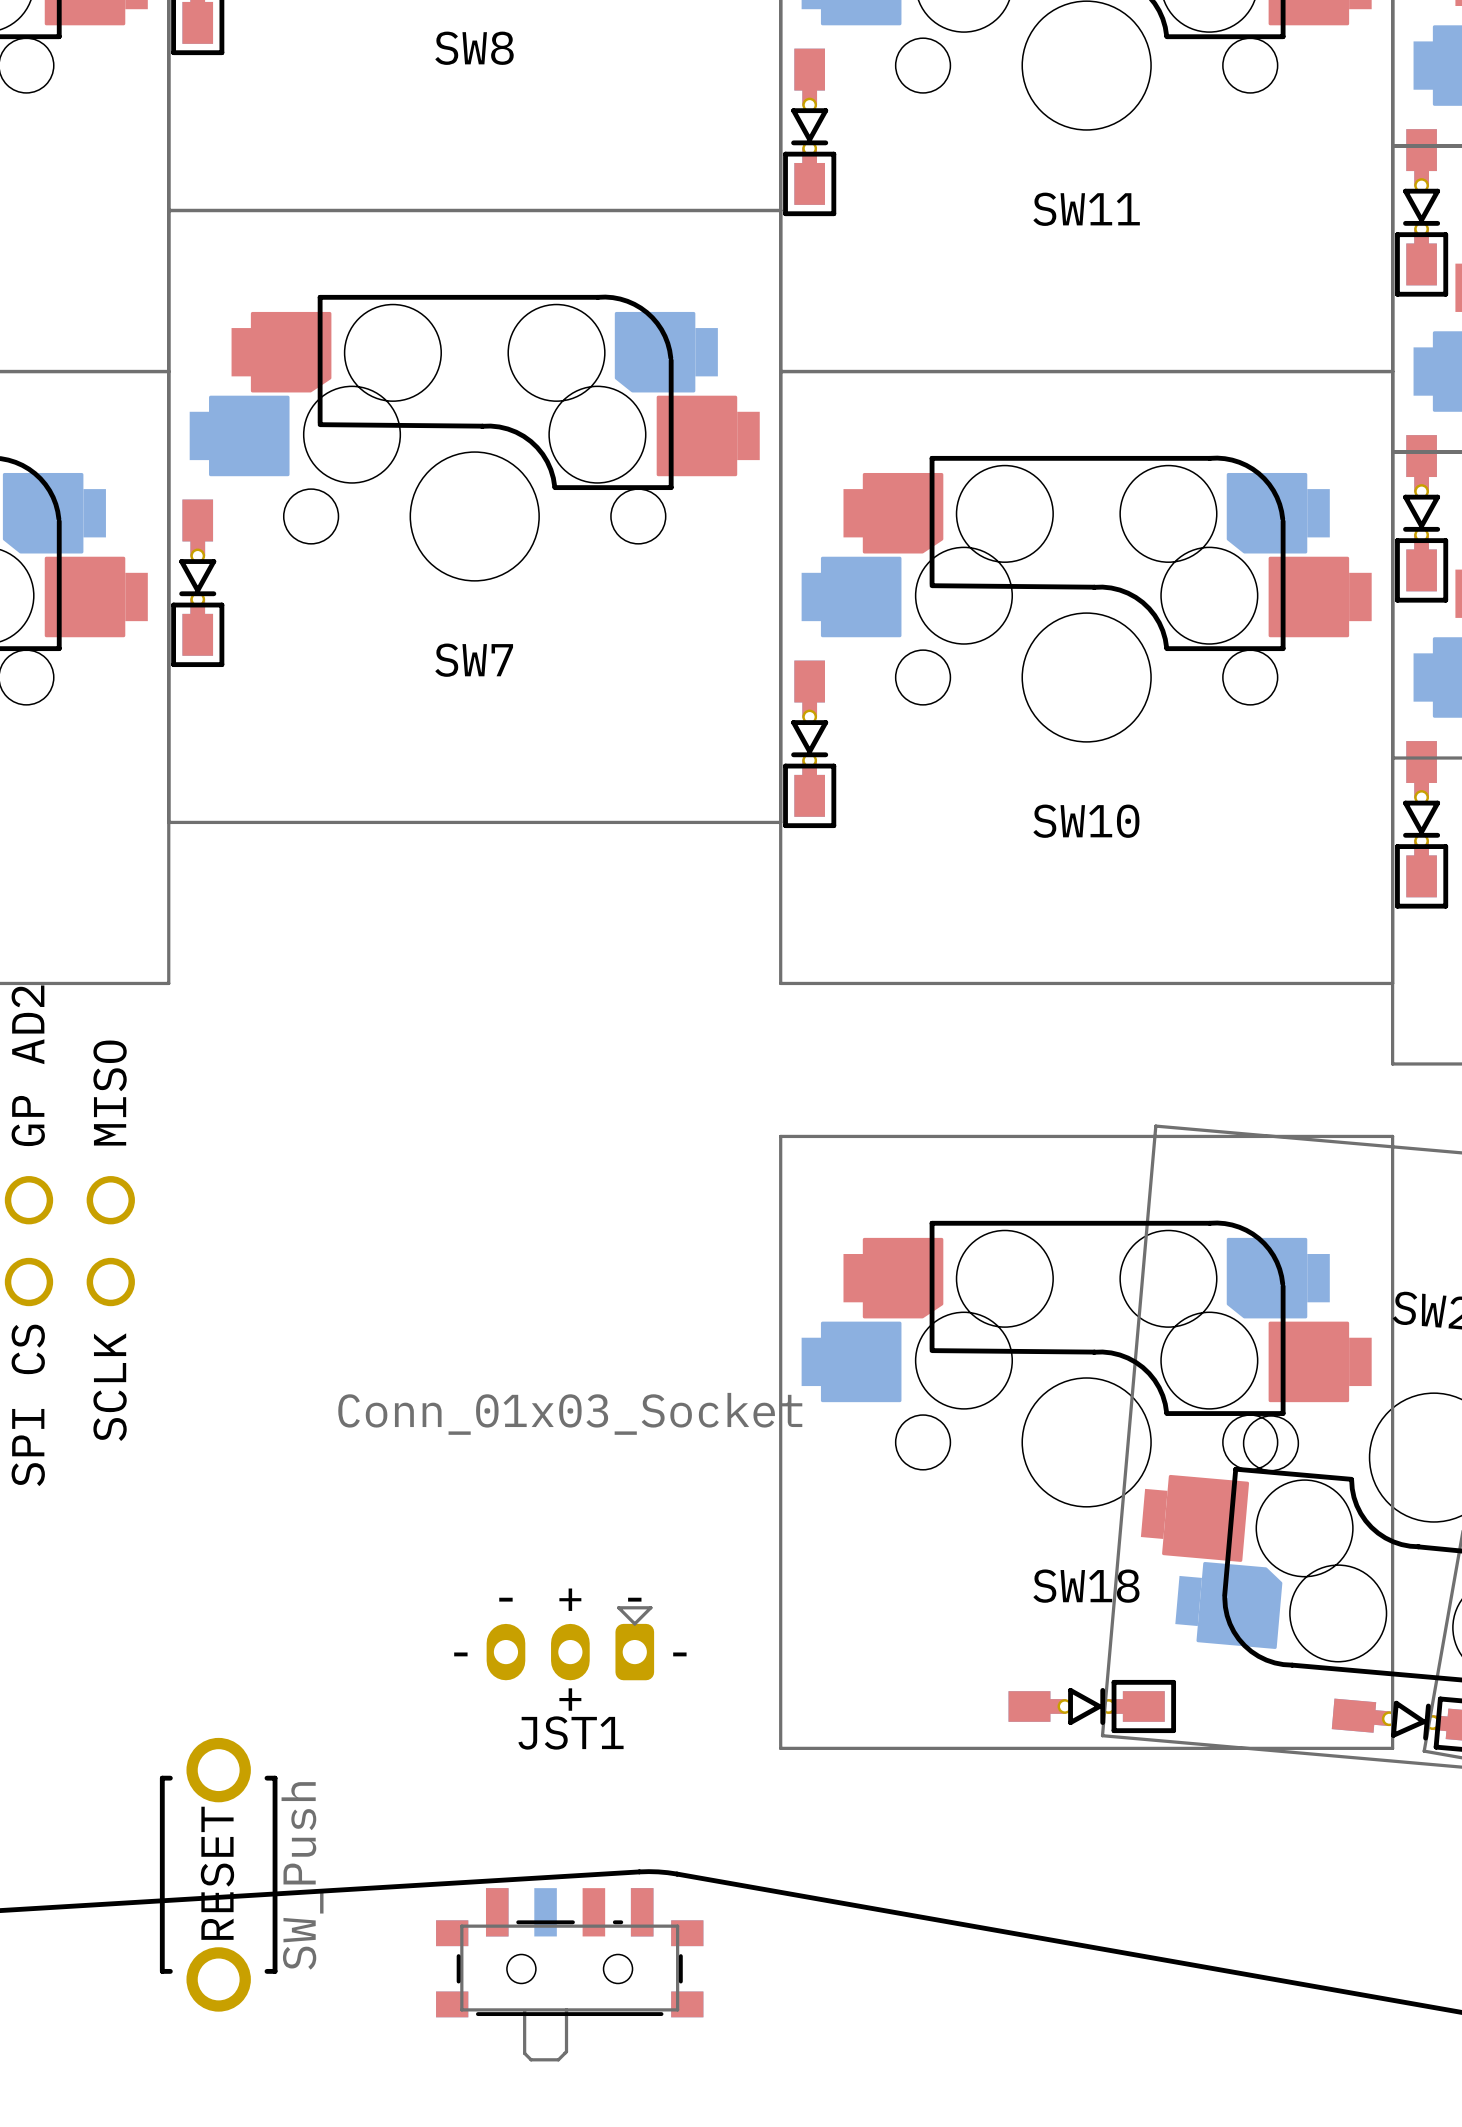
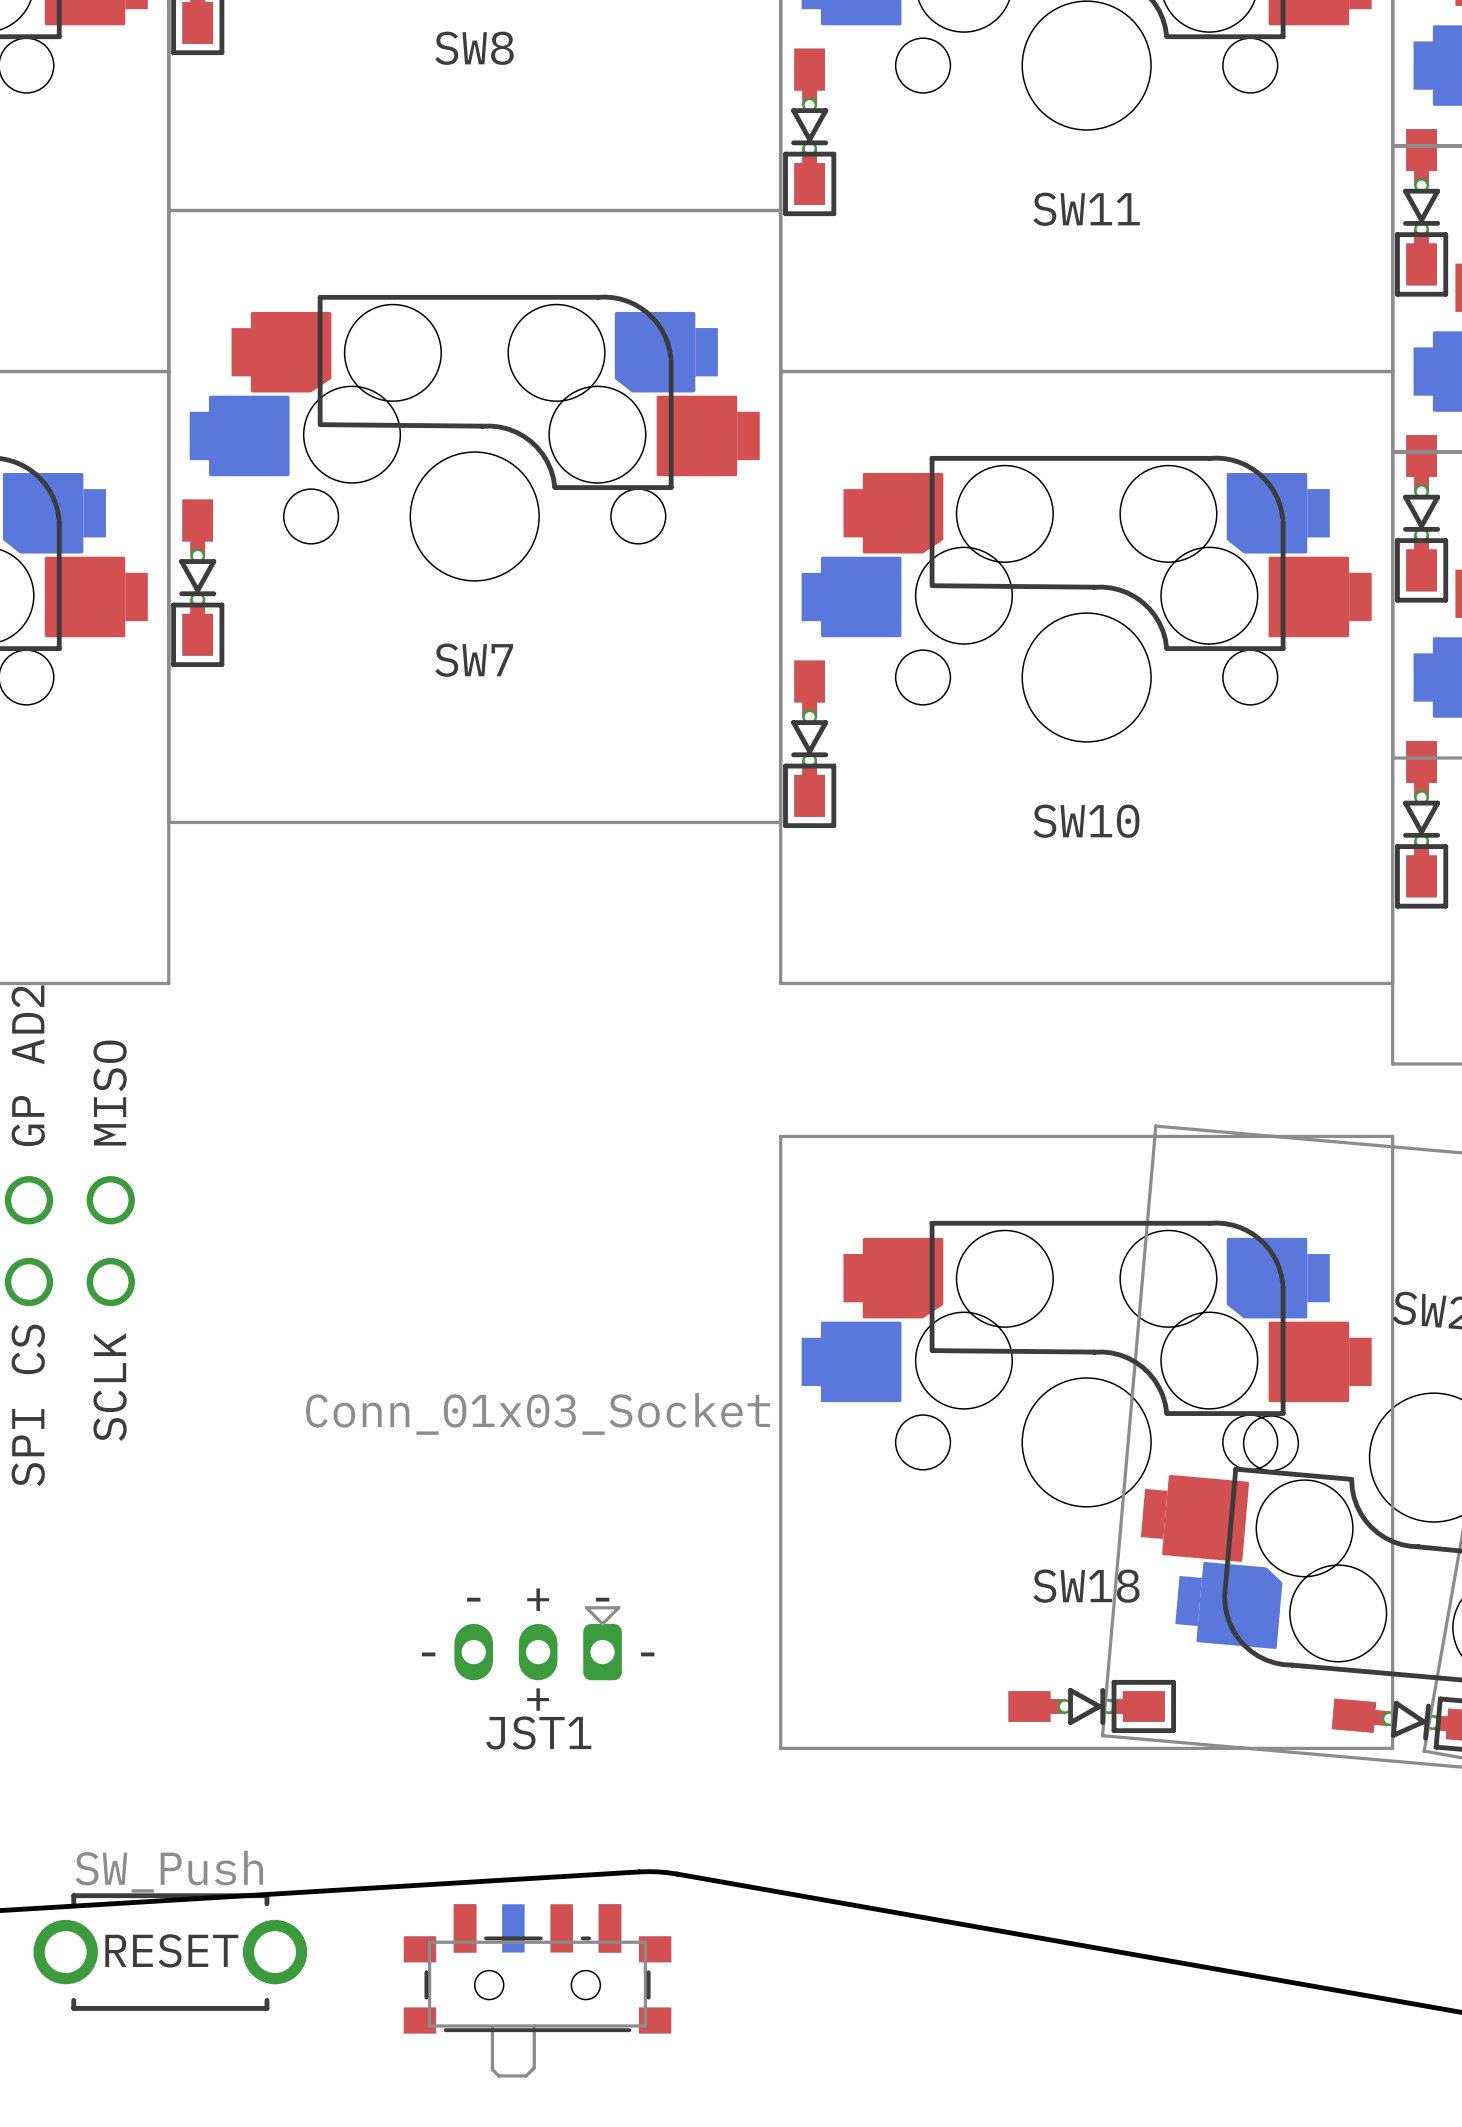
JST1 position: (570, 1643) -> (538, 1643)
part rotation: 0° (218, 1874) -> 90° clockwise (170, 1952)
part value position: SW_Push (302, 1875) -> SW_Push (169, 1871)
part position: (569, 1974) -> (537, 1990)

